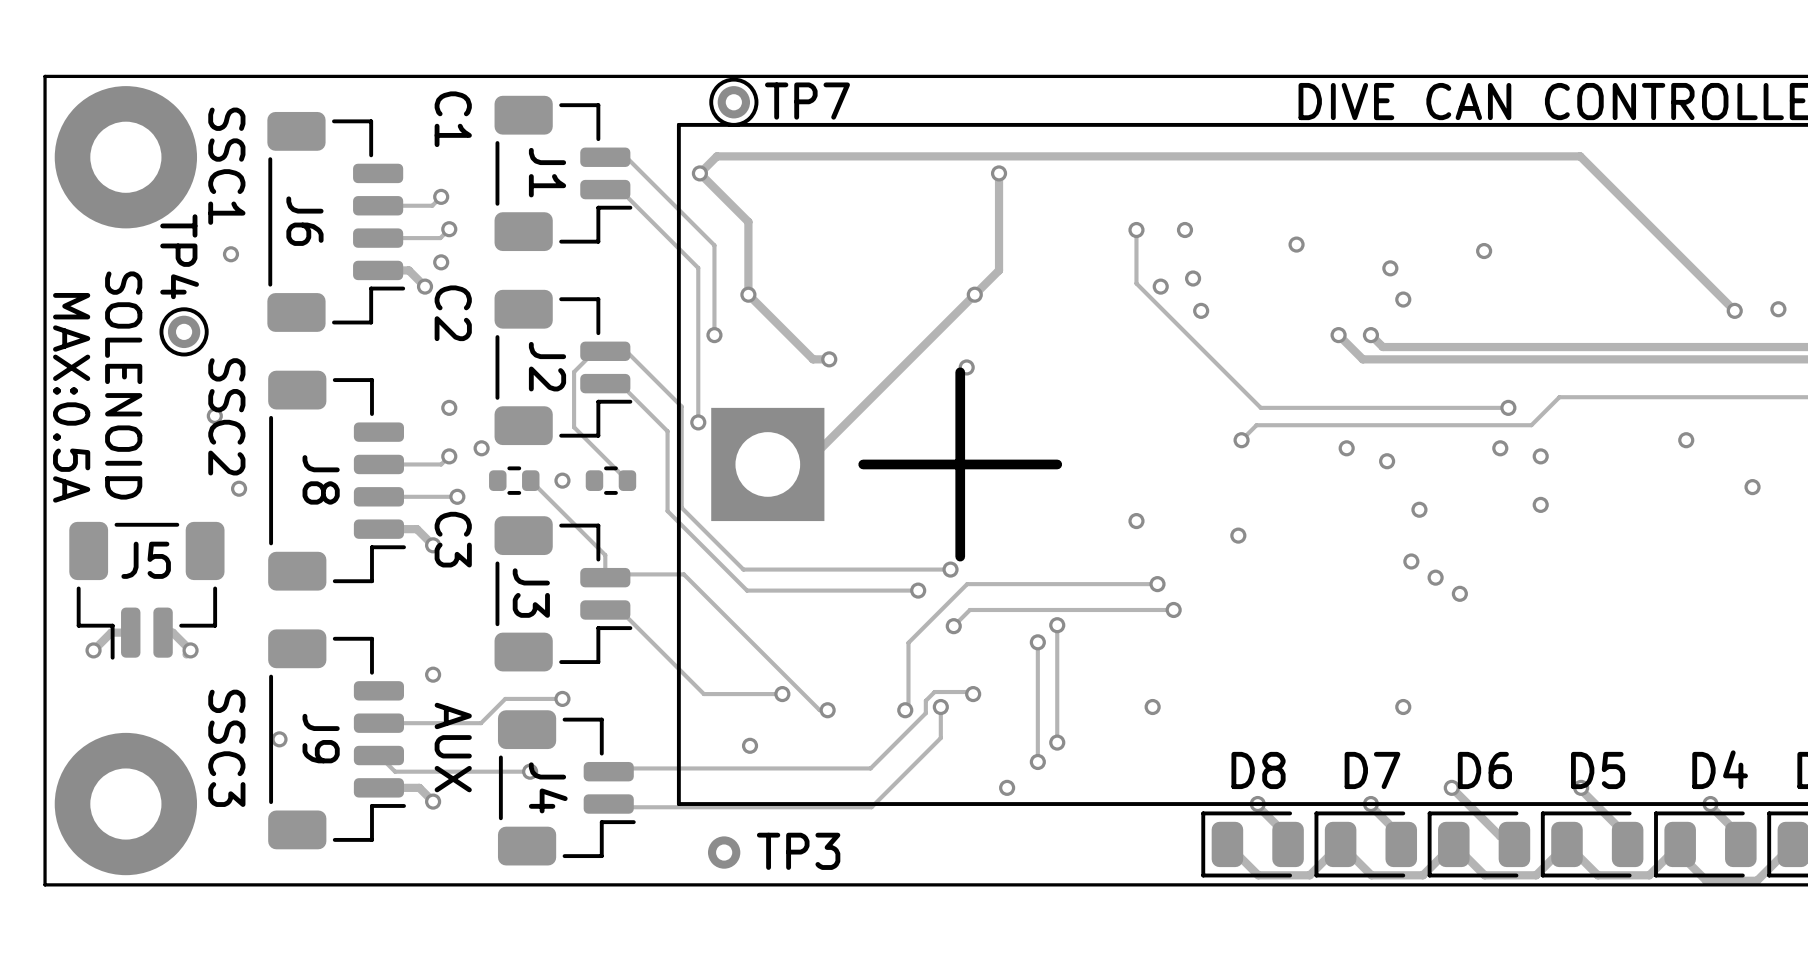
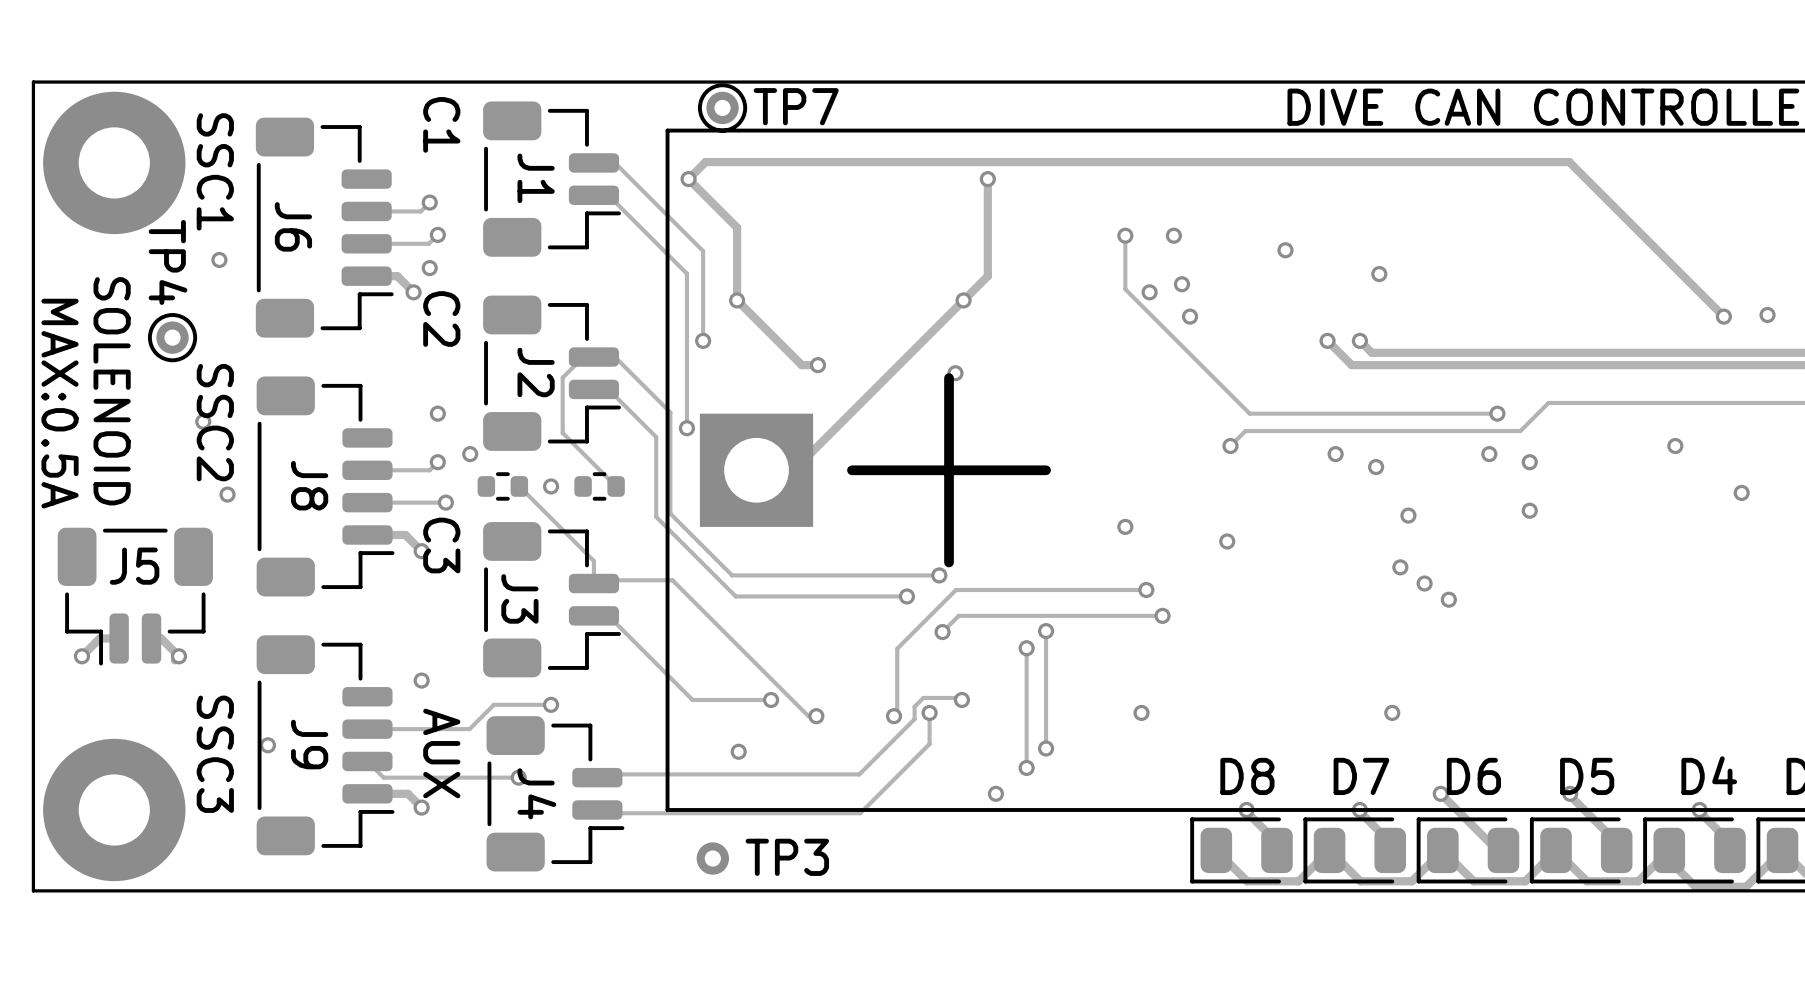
via: (1484, 251) -> none
via: (1403, 299) -> none

